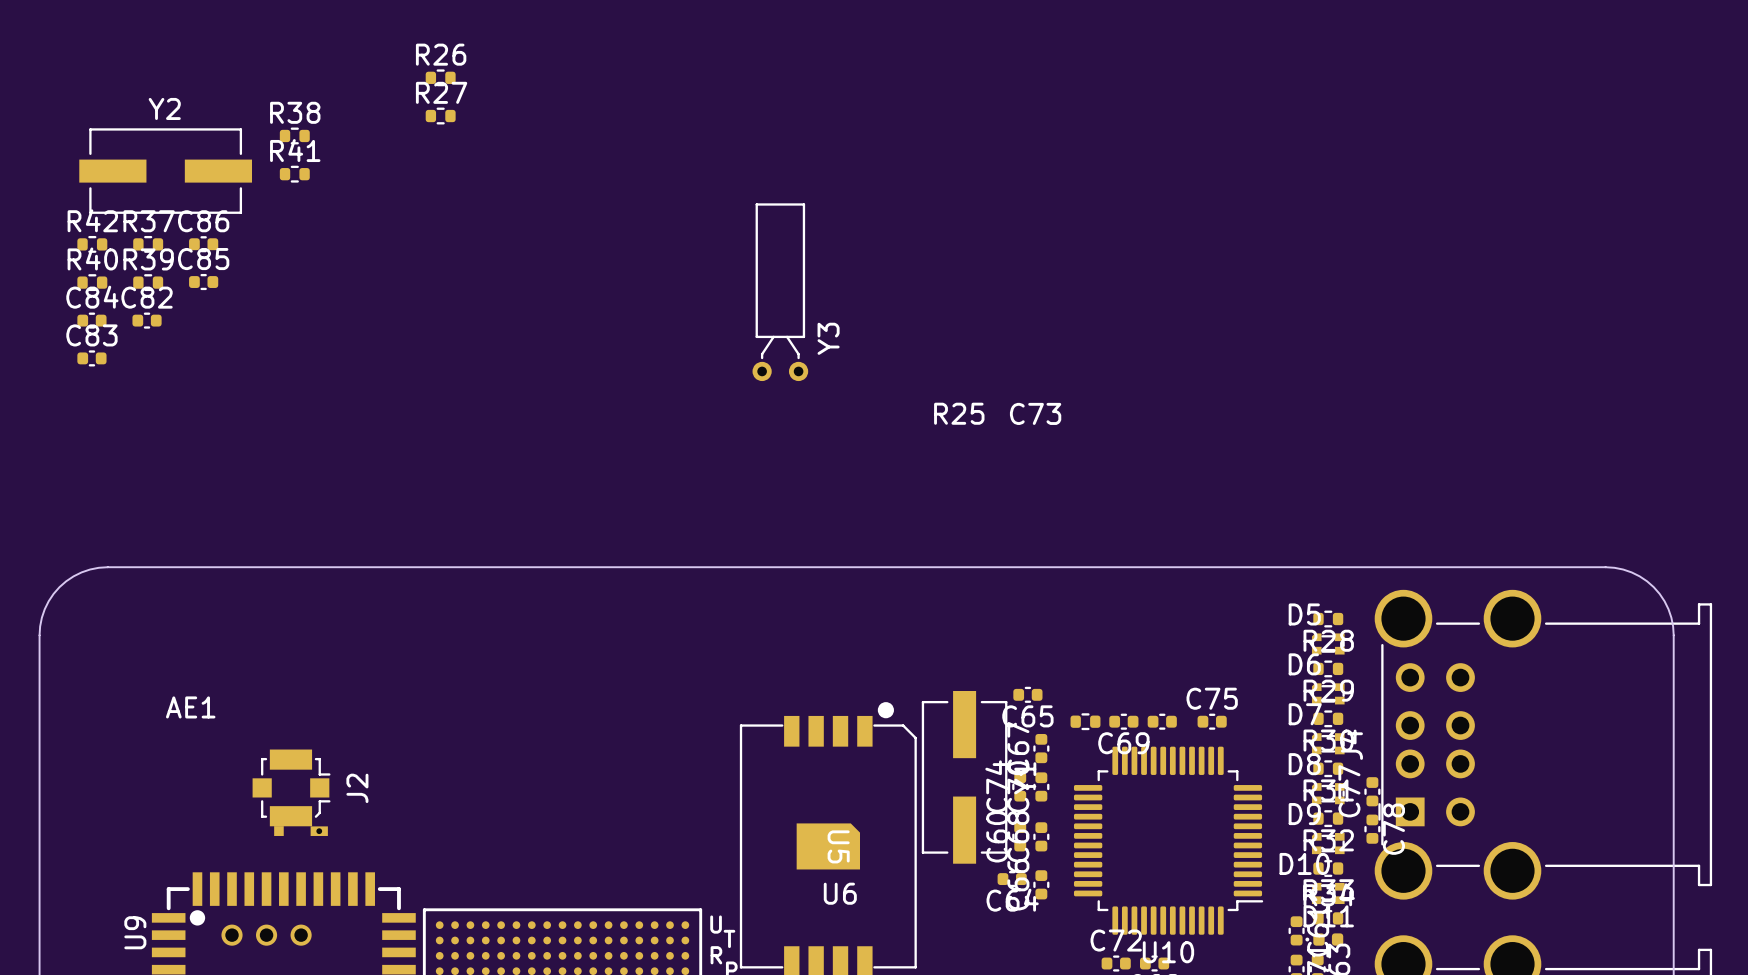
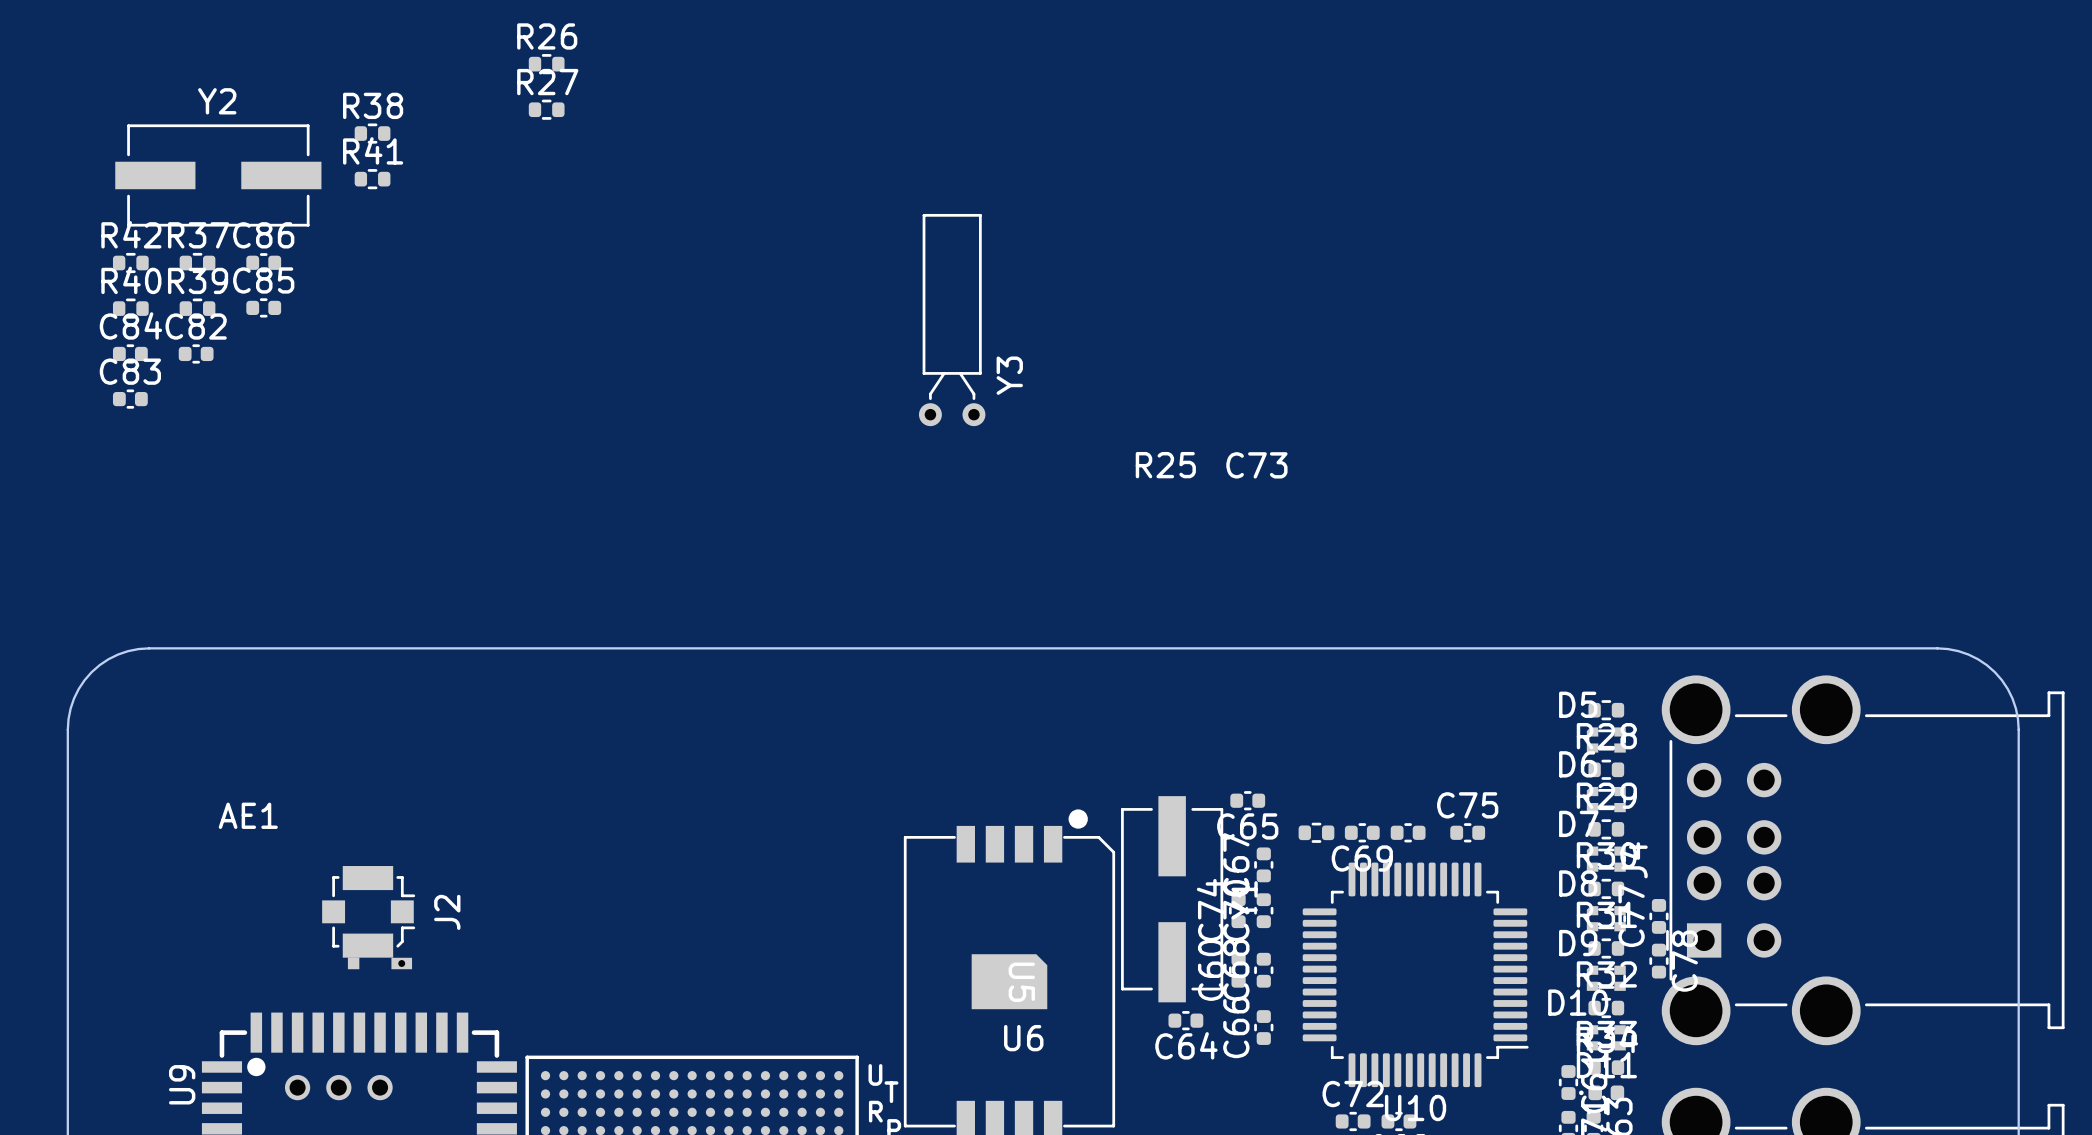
C64 position: (1012, 879) -> (1185, 1020)

